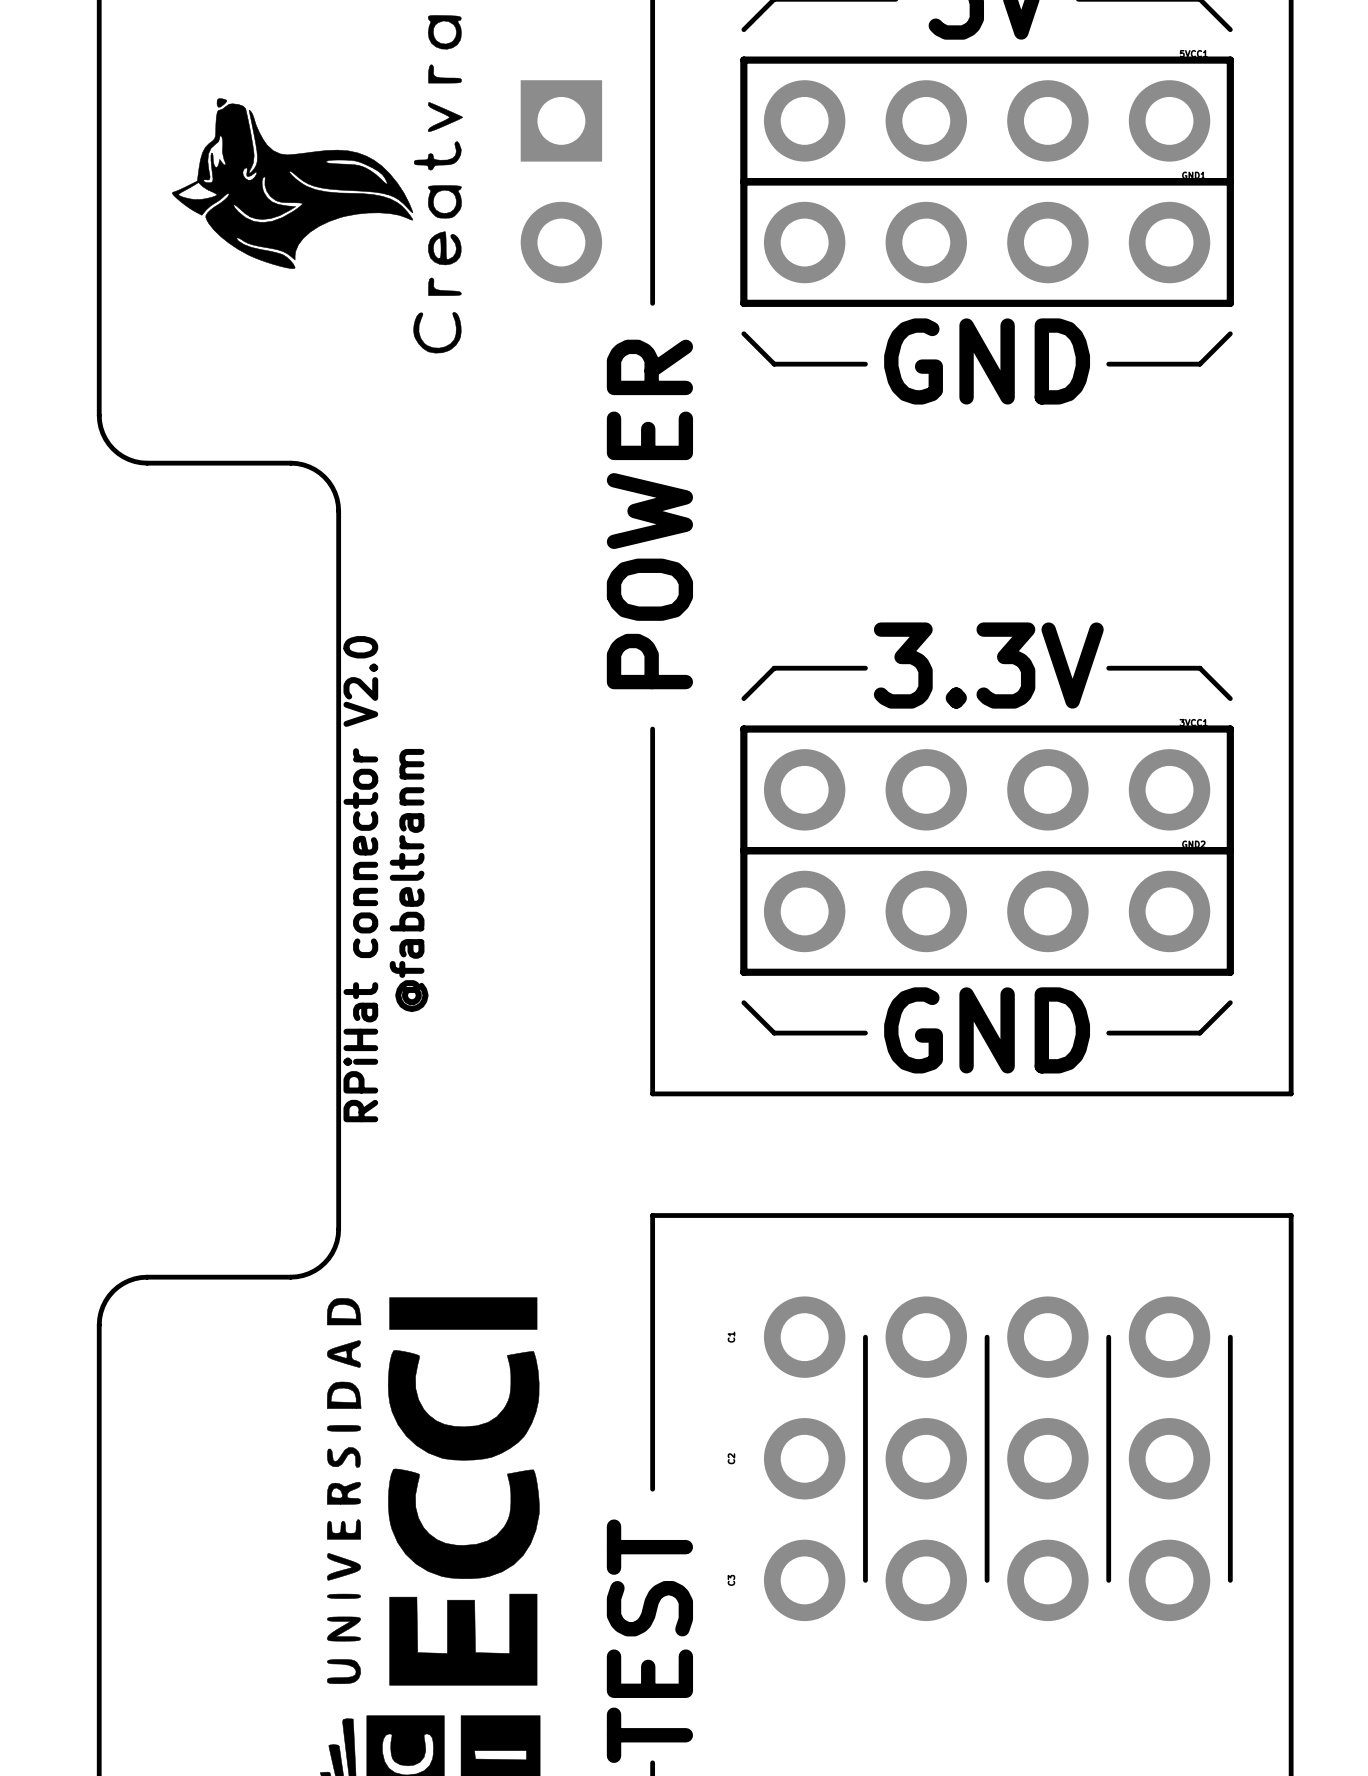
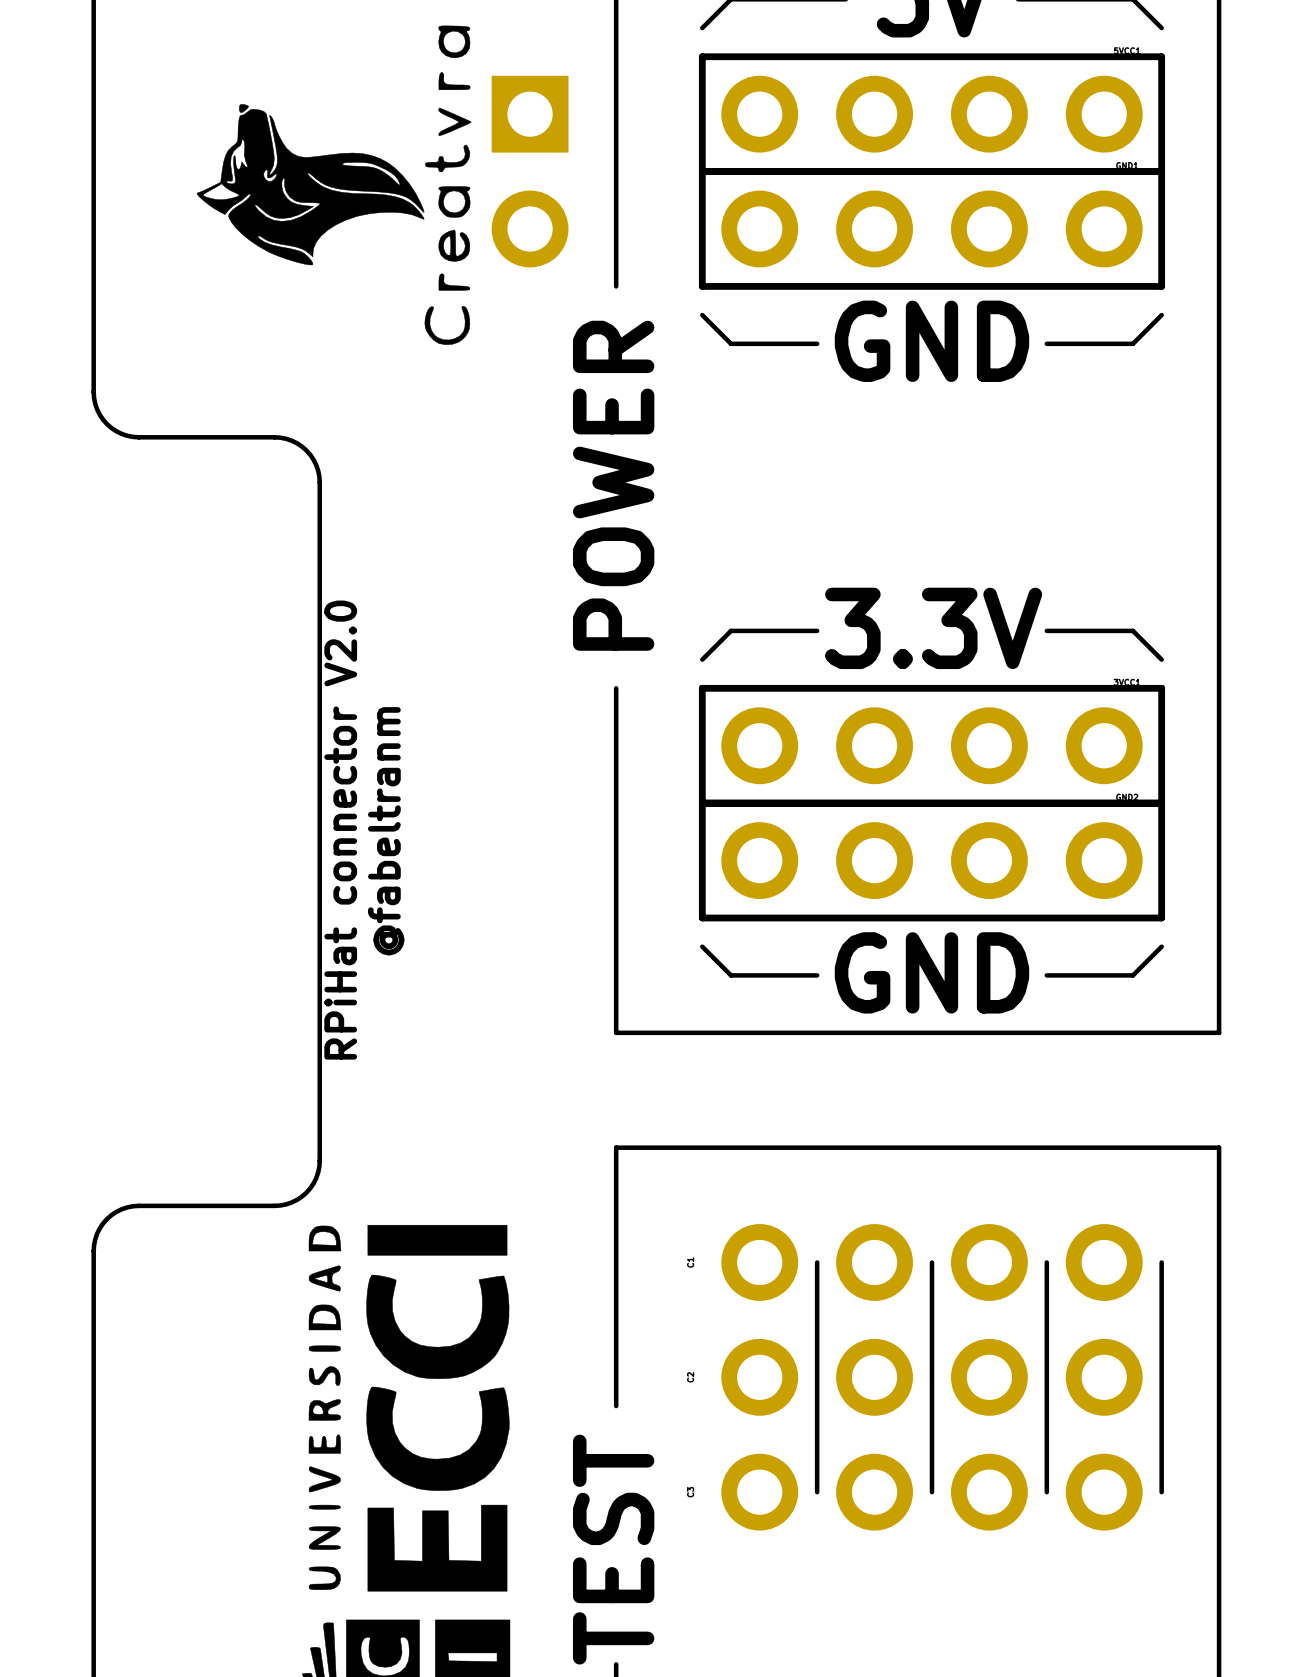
drawing position: (317, 184) -> (334, 185)

